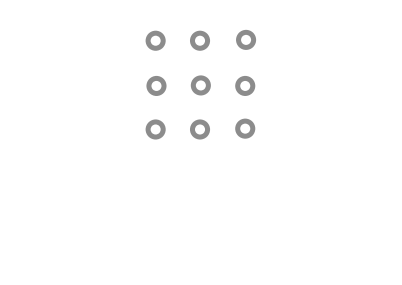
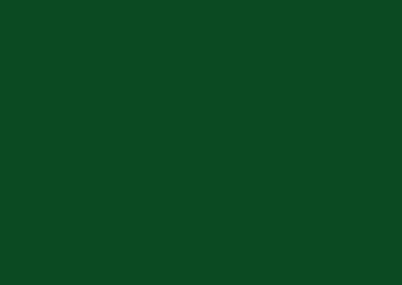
via: (246, 39) -> none
via: (155, 40) -> none
via: (200, 40) -> none
via: (156, 85) -> none
via: (200, 85) -> none
via: (245, 85) -> none
via: (245, 128) -> none
via: (155, 129) -> none
via: (200, 129) -> none

